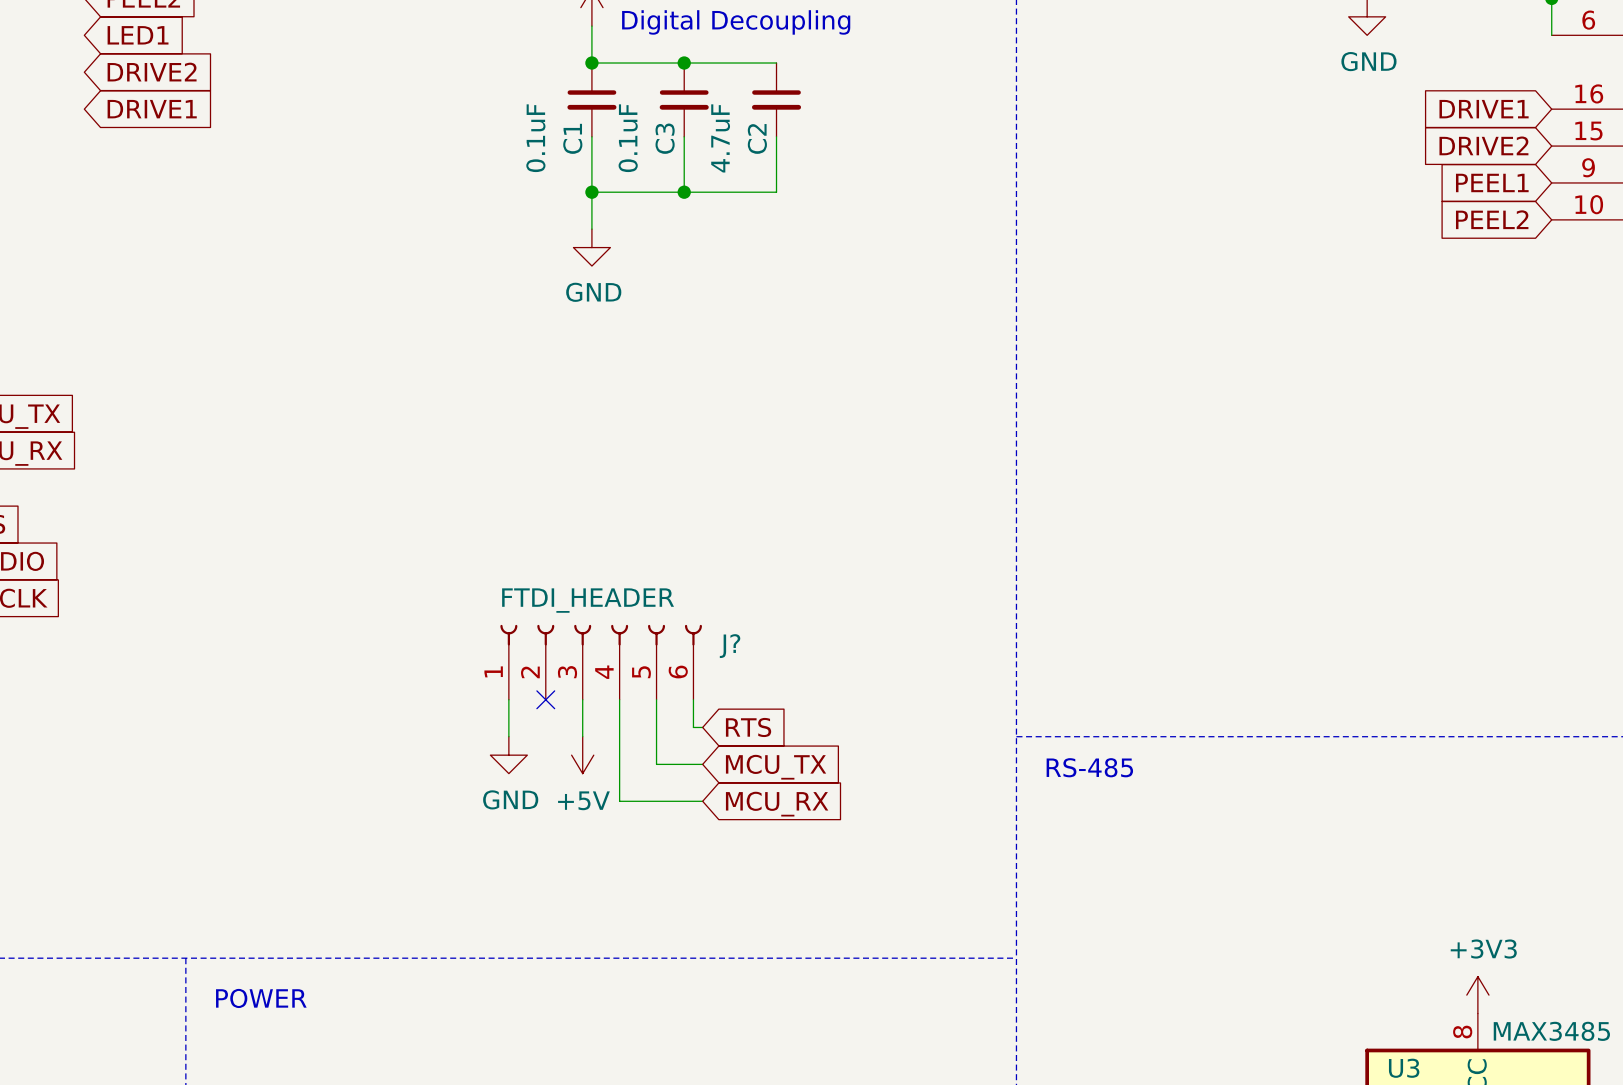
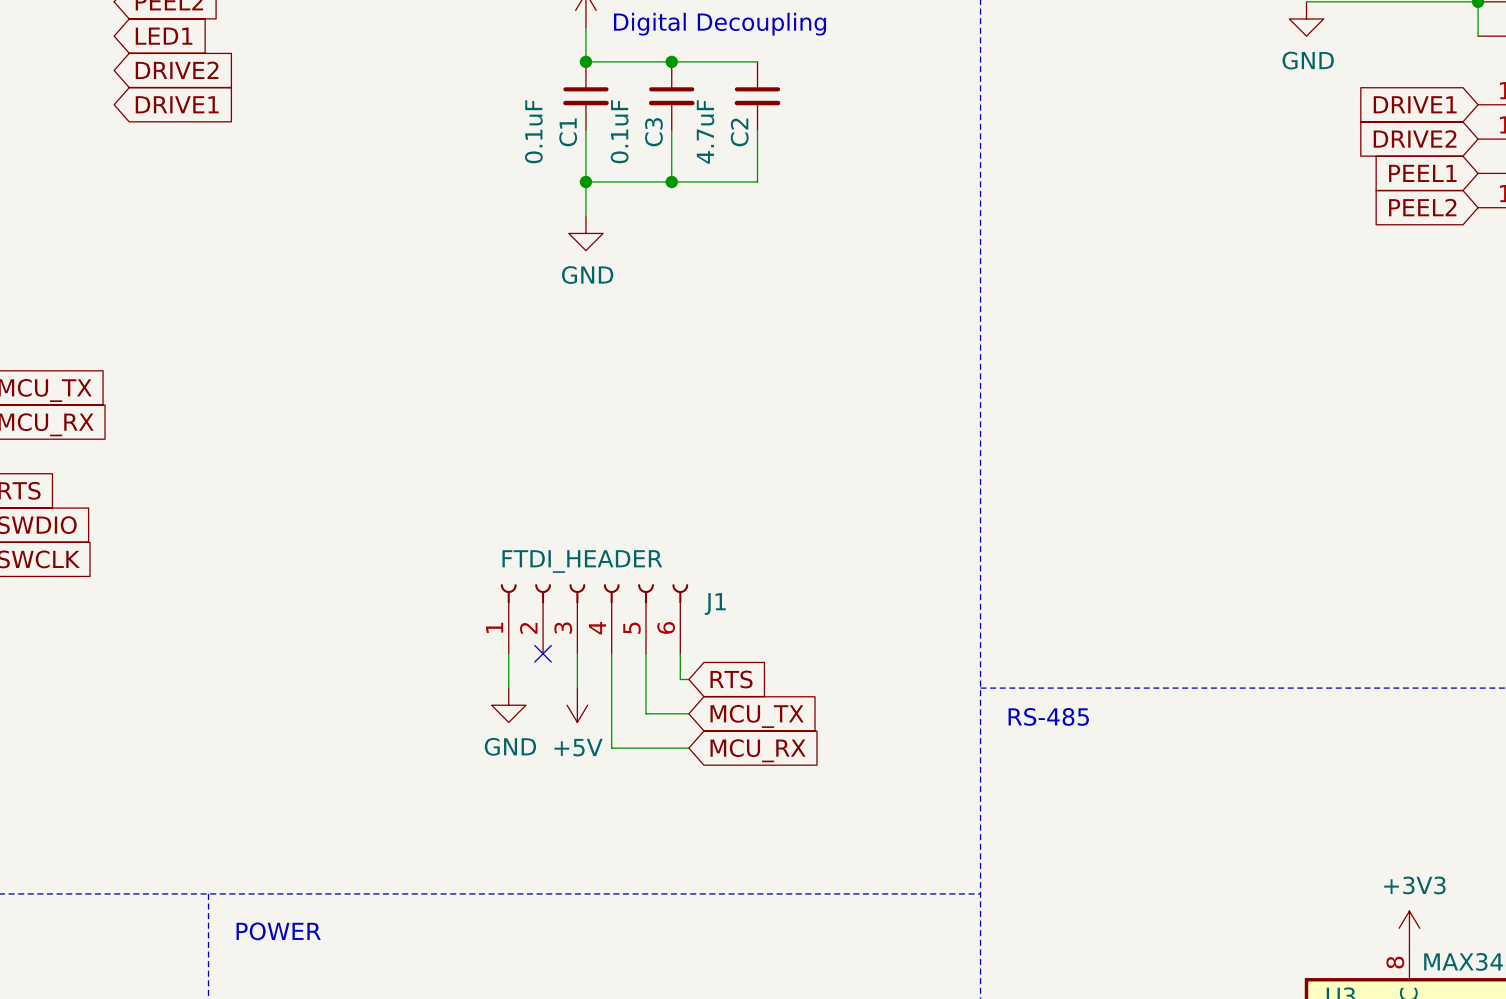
J? name: J? (730, 646) -> J1 (715, 604)

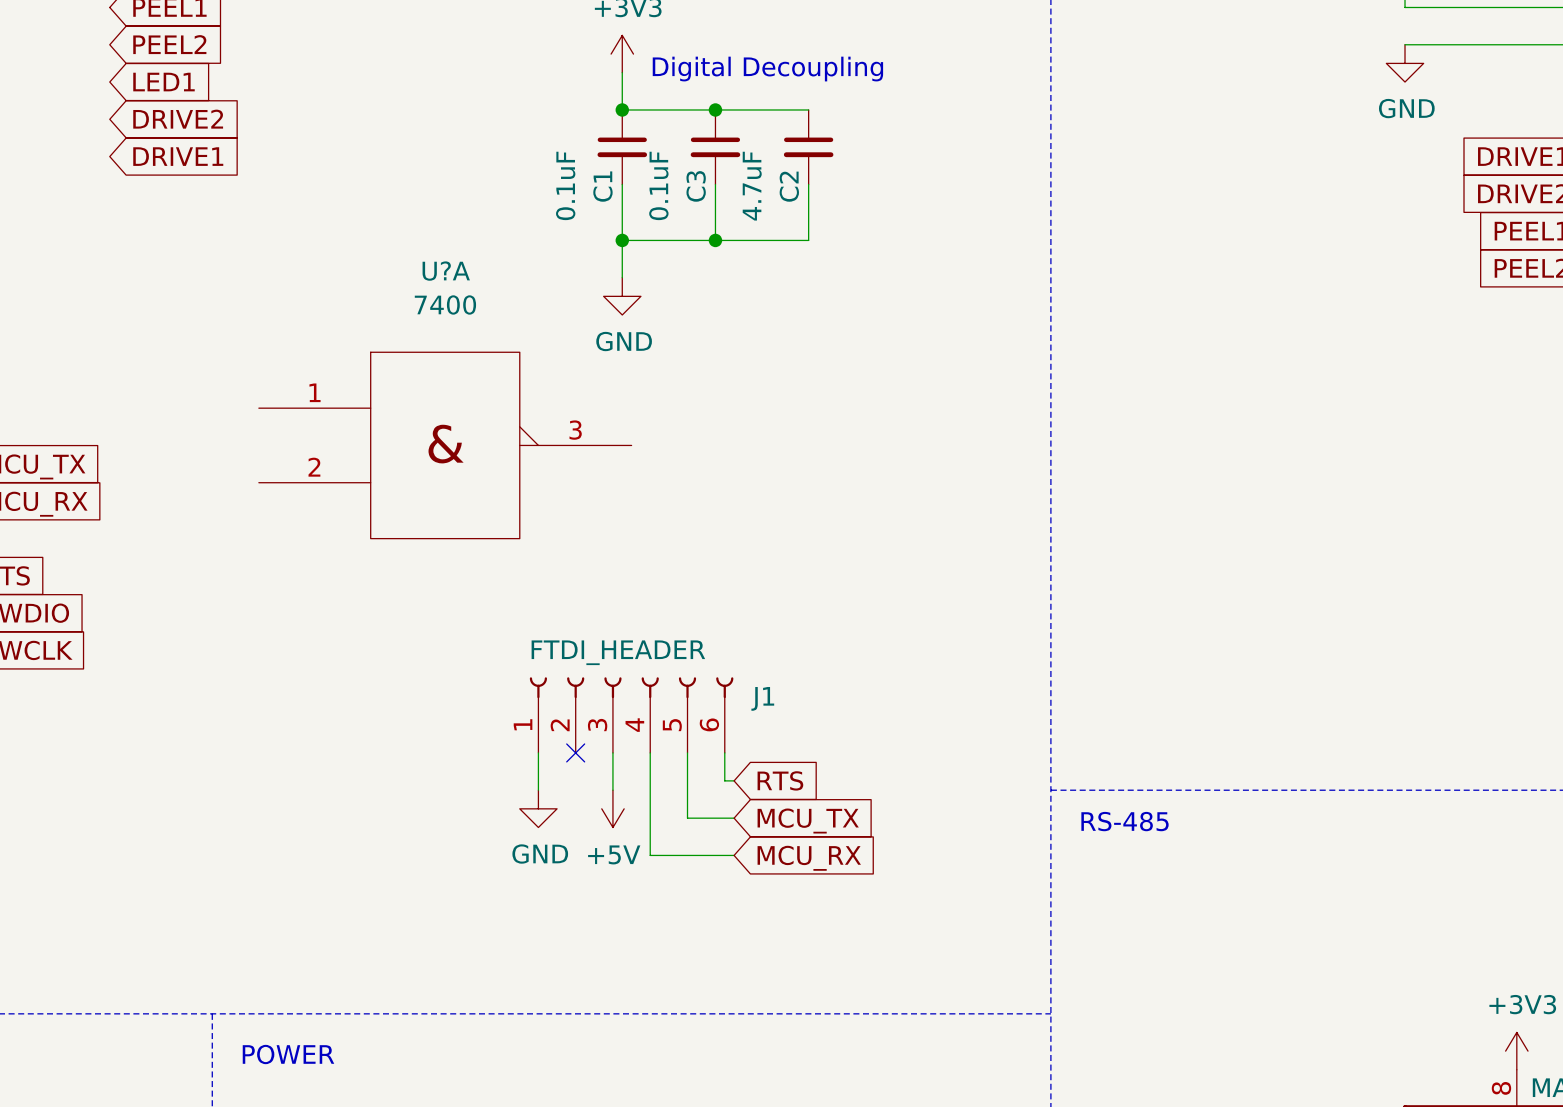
U?A: none -> 7400 (445, 445)

